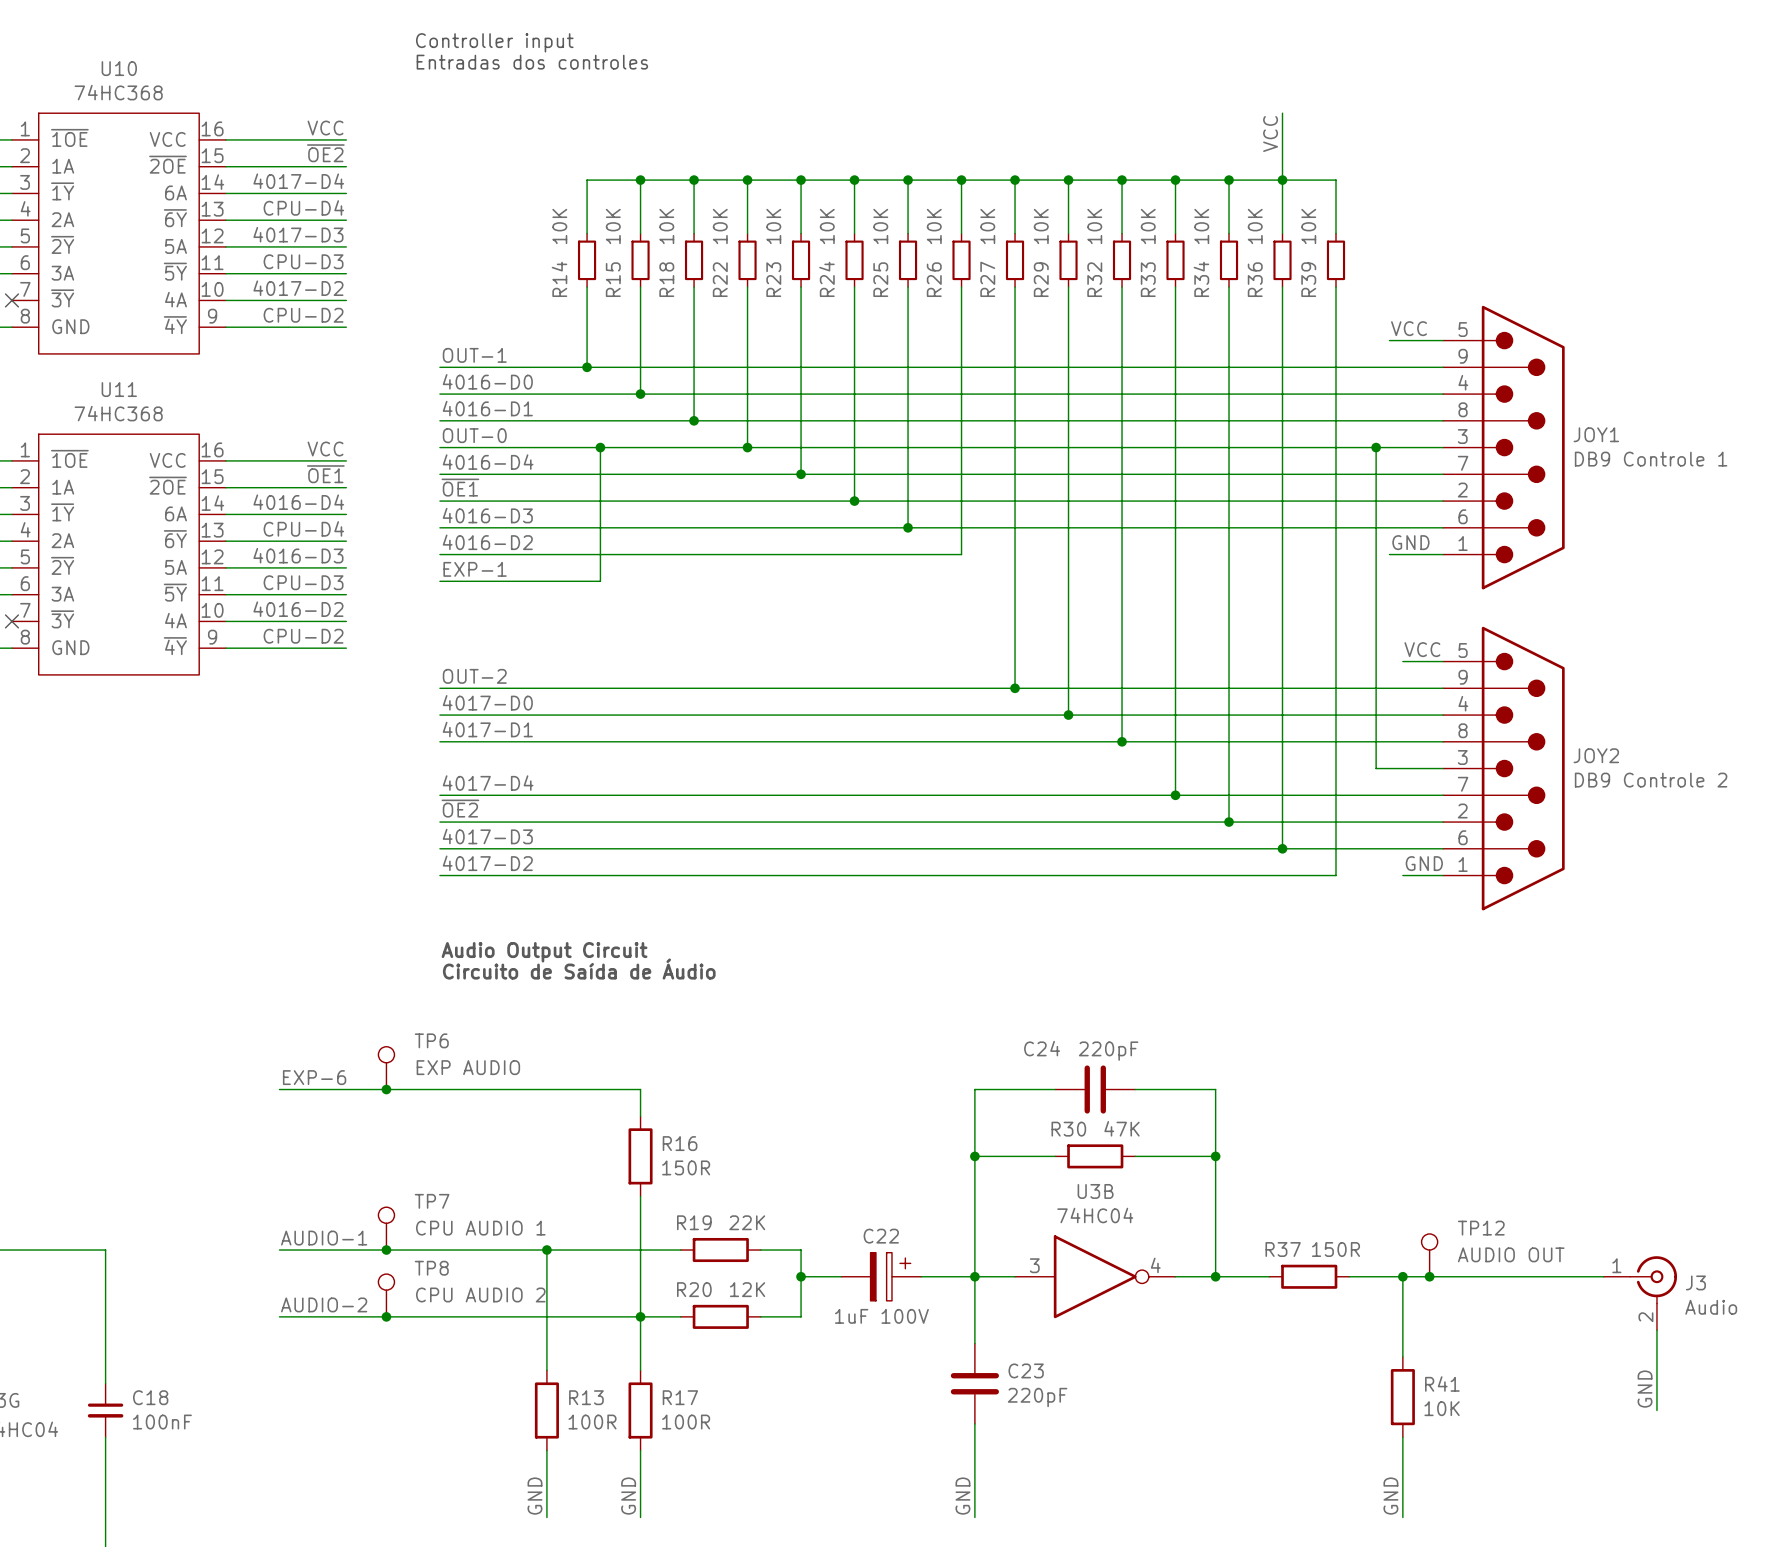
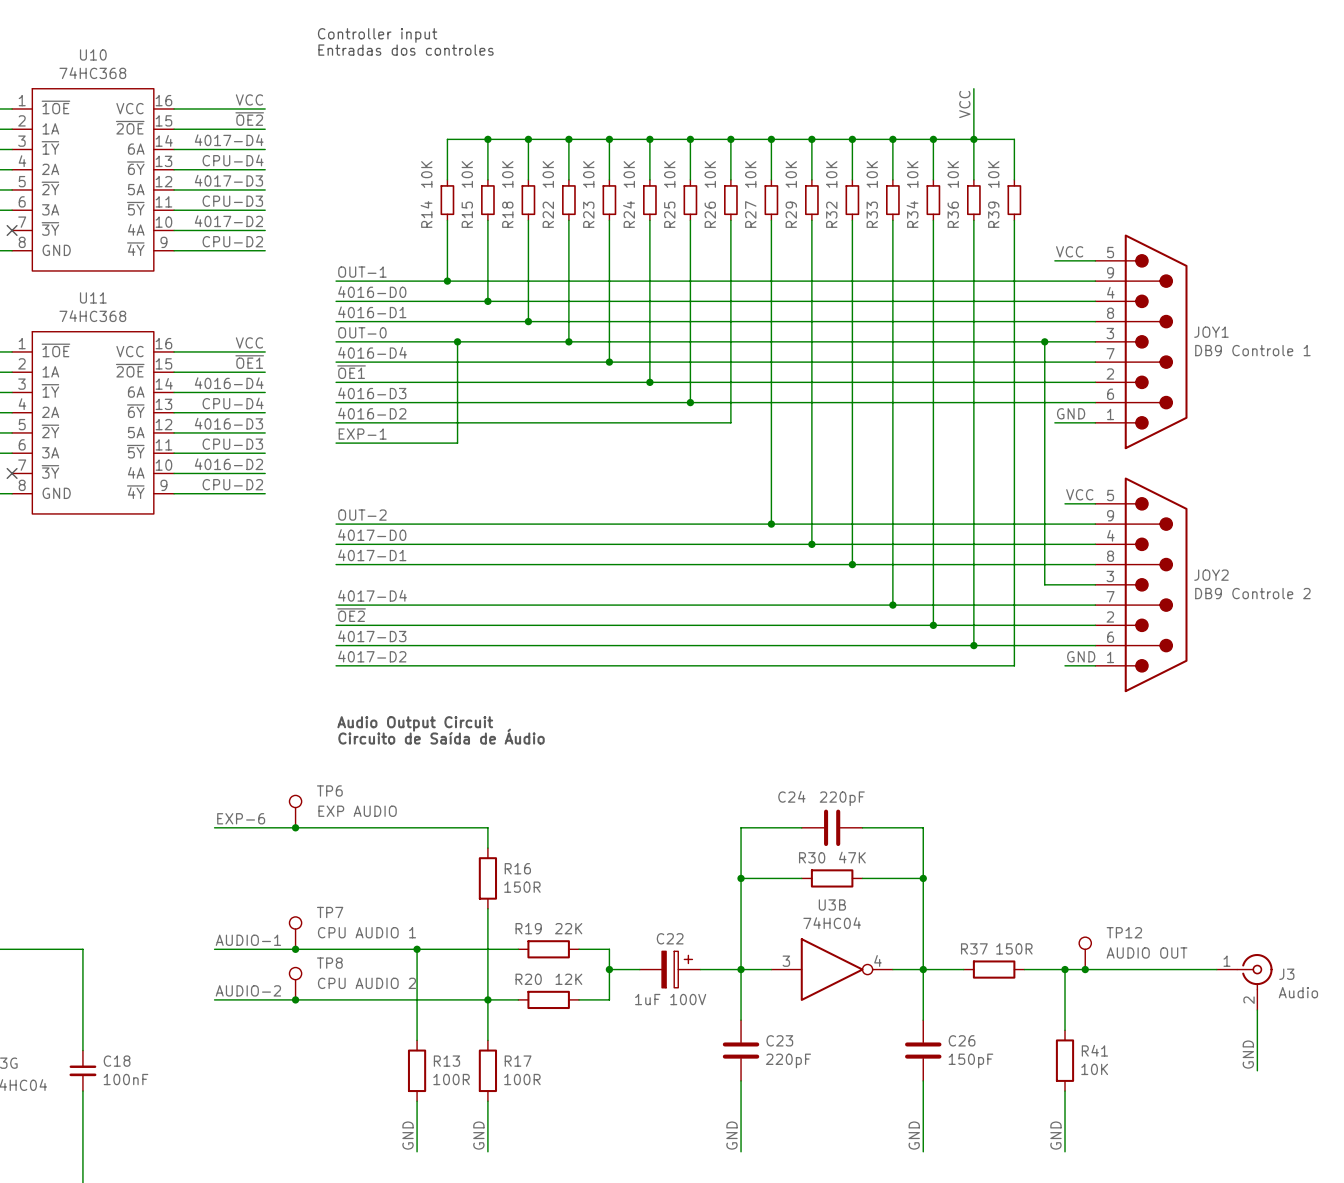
wire: none -> (923, 969) (923, 1020)
C26: none -> 150pF (923, 1050)
wire: none -> (923, 1080) (923, 1151)
label: none -> GND (914, 1135)

